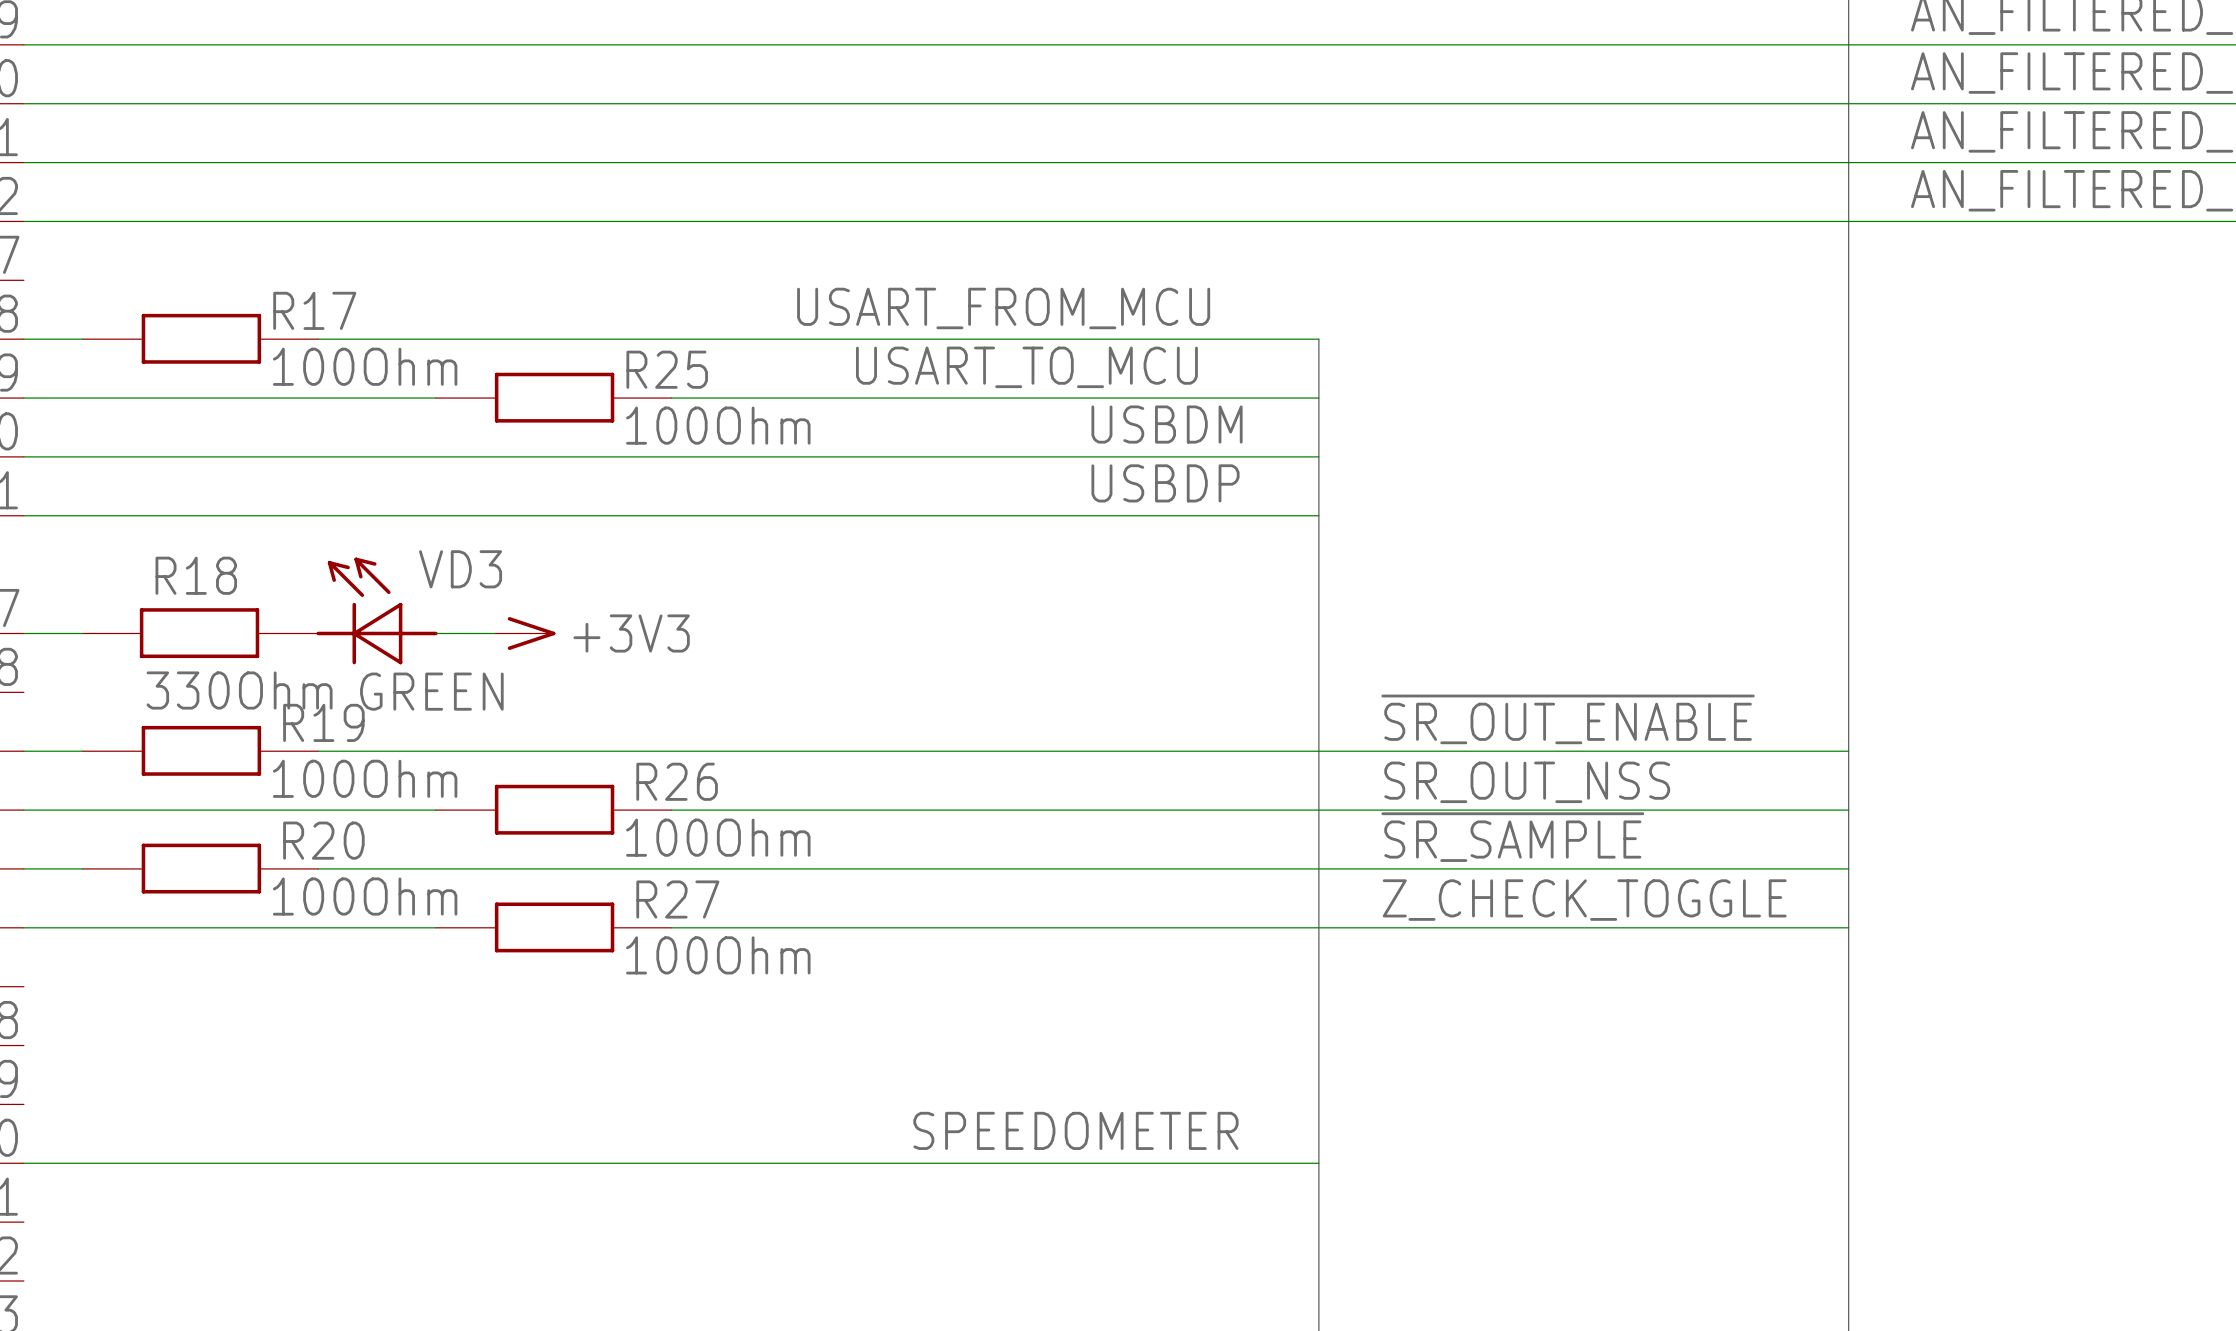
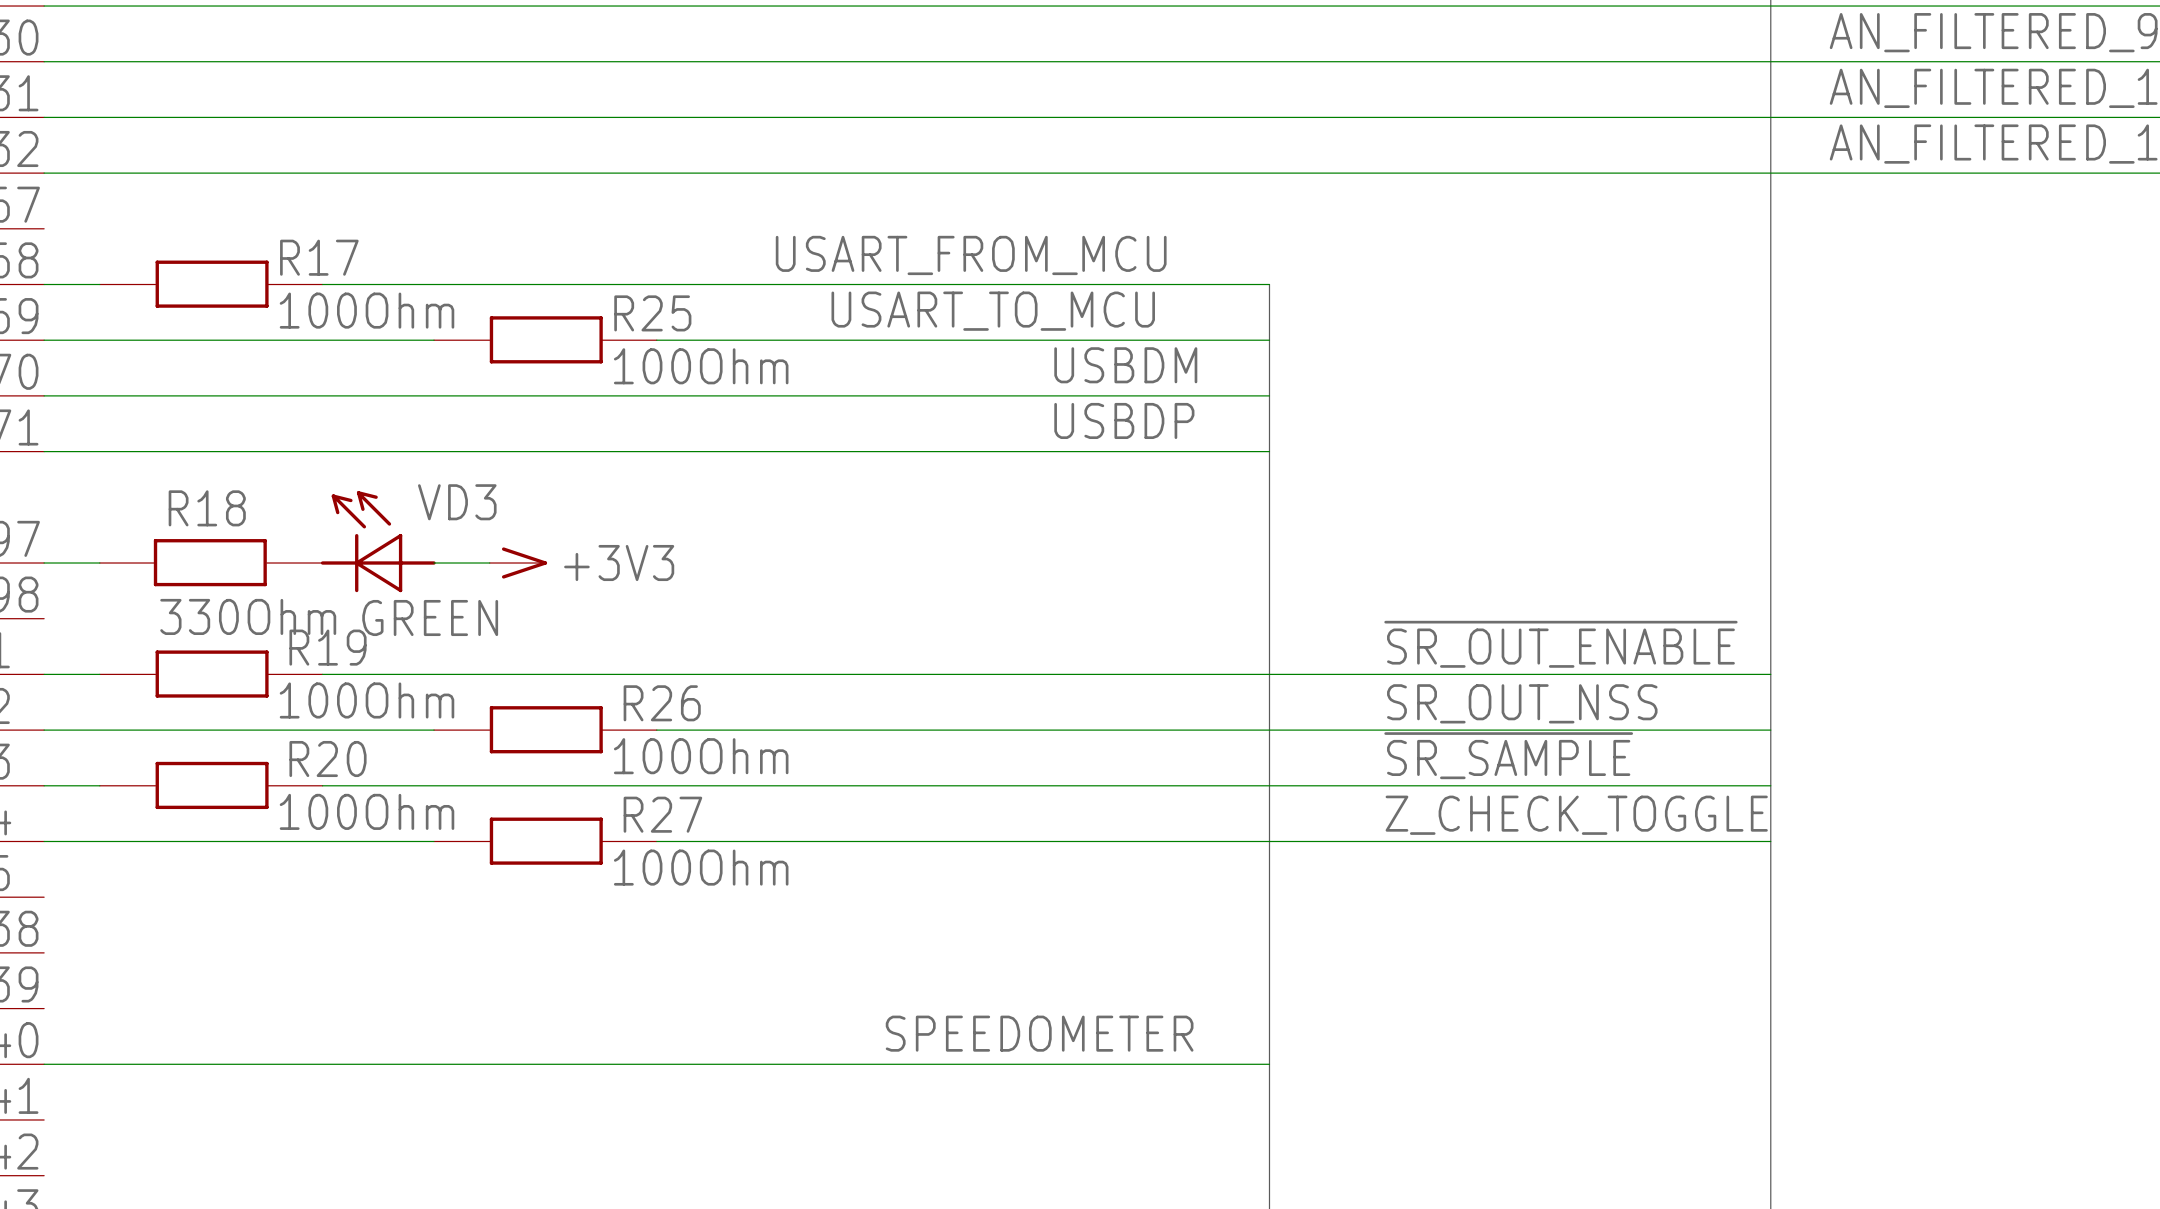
label position: ~{SR_OUT_ENABLE} (1568, 719) -> ~{SR_OUT_ENABLE} (1560, 644)
label position: SR_OUT_NSS (1527, 782) -> SR_OUT_NSS (1522, 703)
label position: ~{SR_SAMPLE} (1512, 837) -> ~{SR_SAMPLE} (1508, 755)
label position: Z_CHECK_TOGGLE (1584, 900) -> Z_CHECK_TOGGLE (1576, 815)

